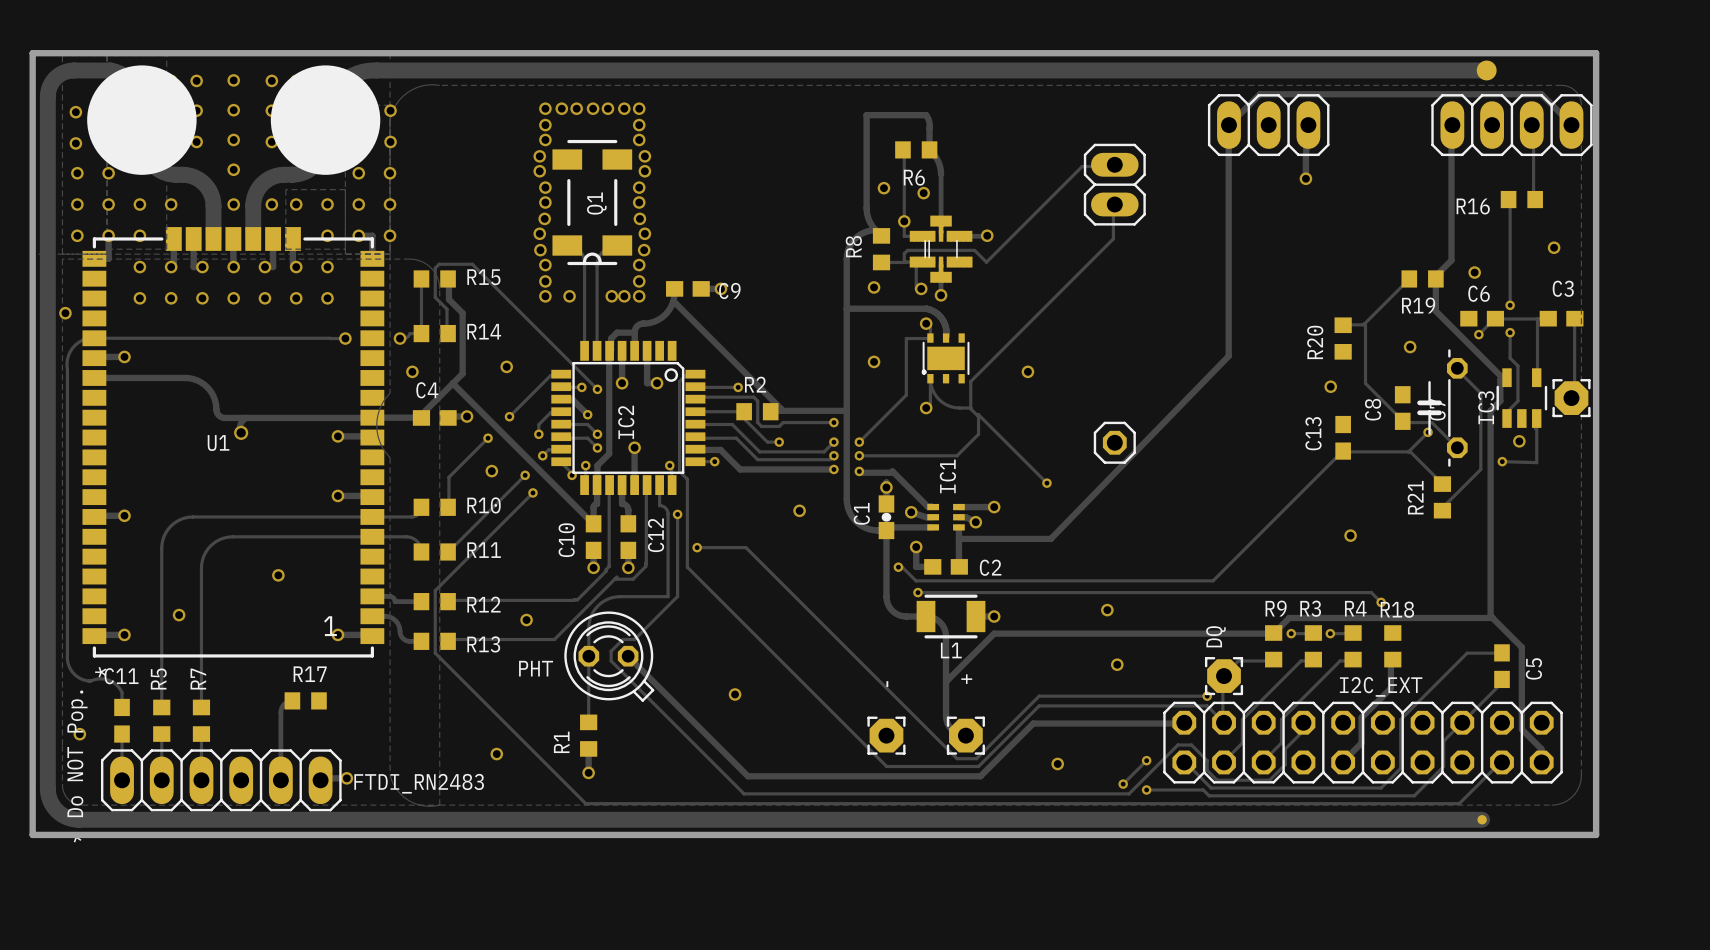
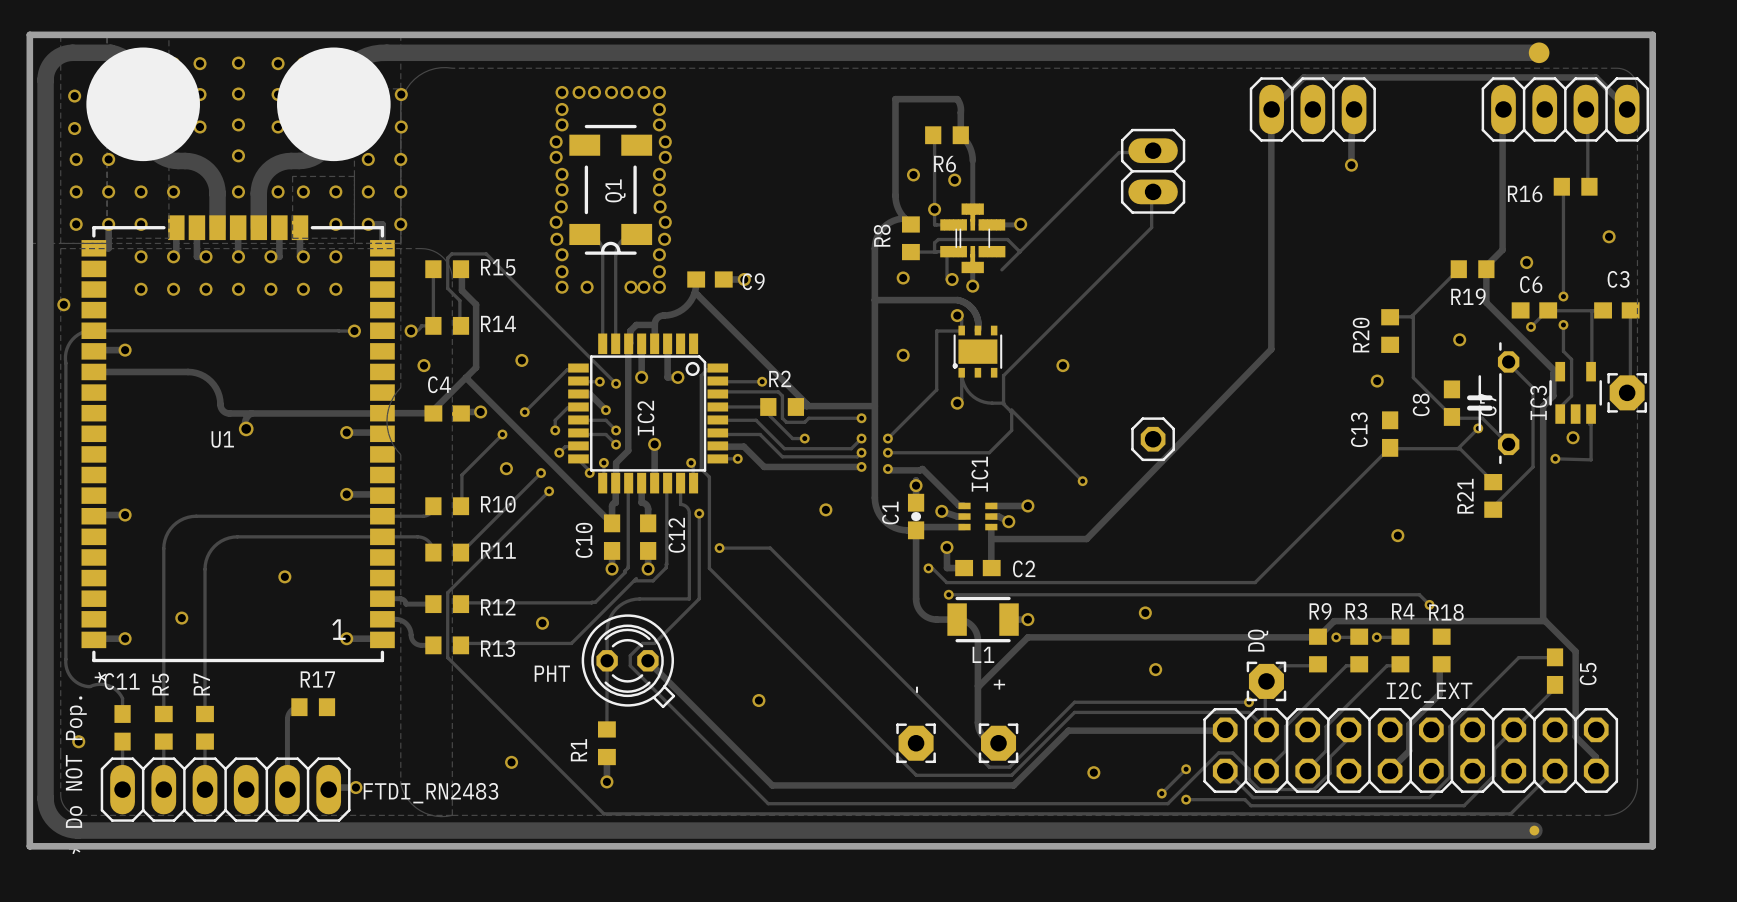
track: none -> (1019, 251) (1001, 269)

